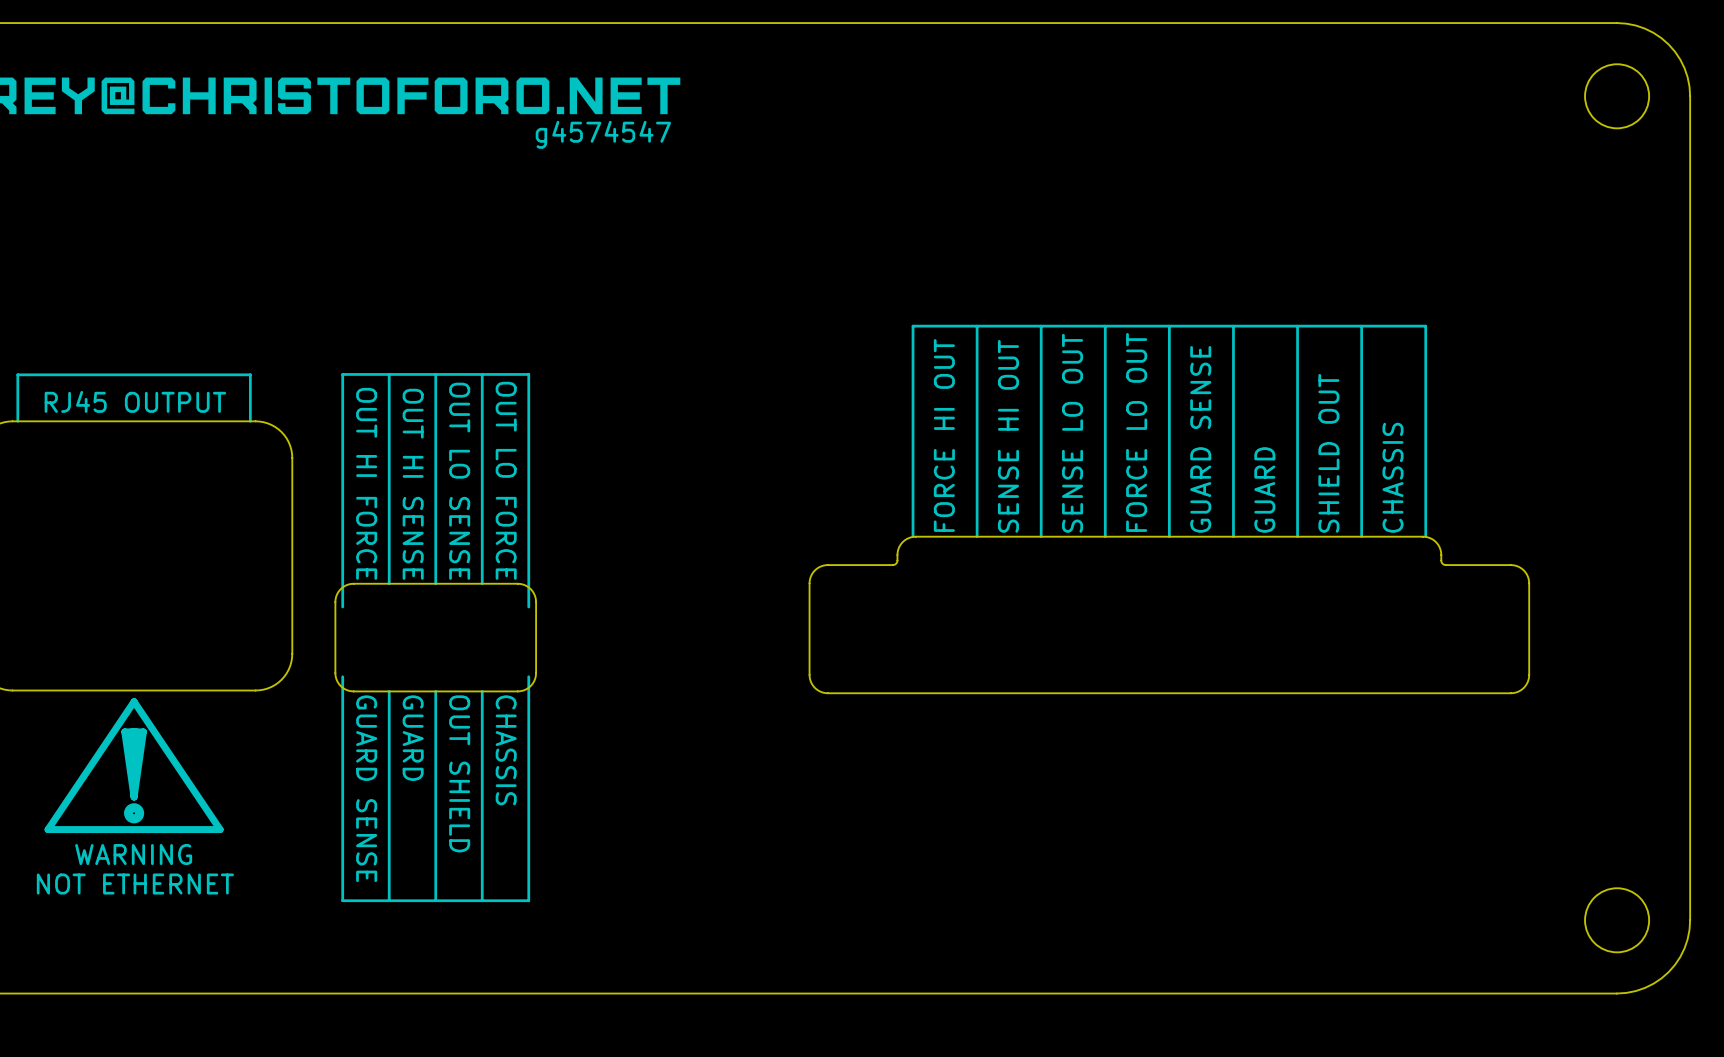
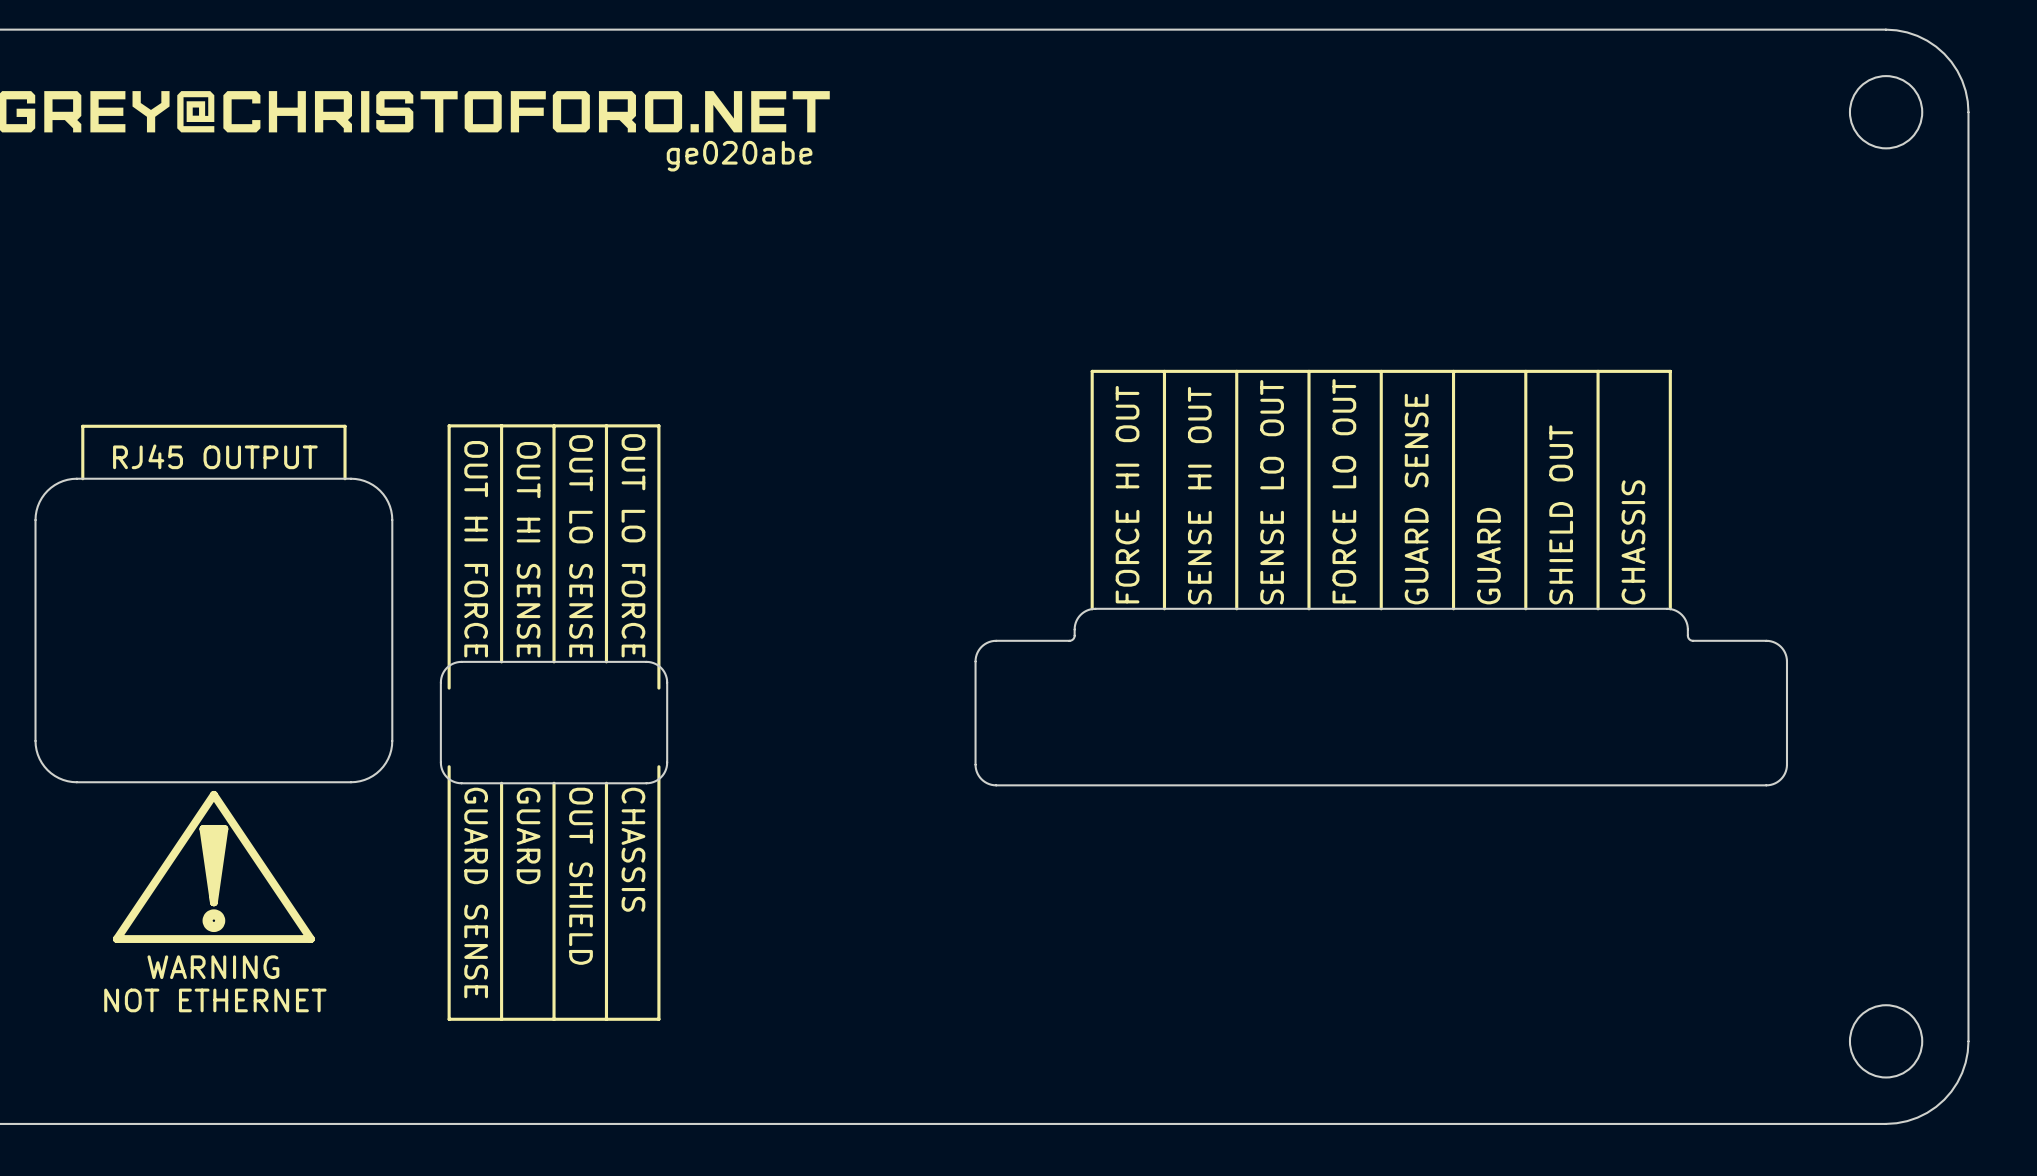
text: g4574547 (603, 134) -> ge020abe (739, 156)

